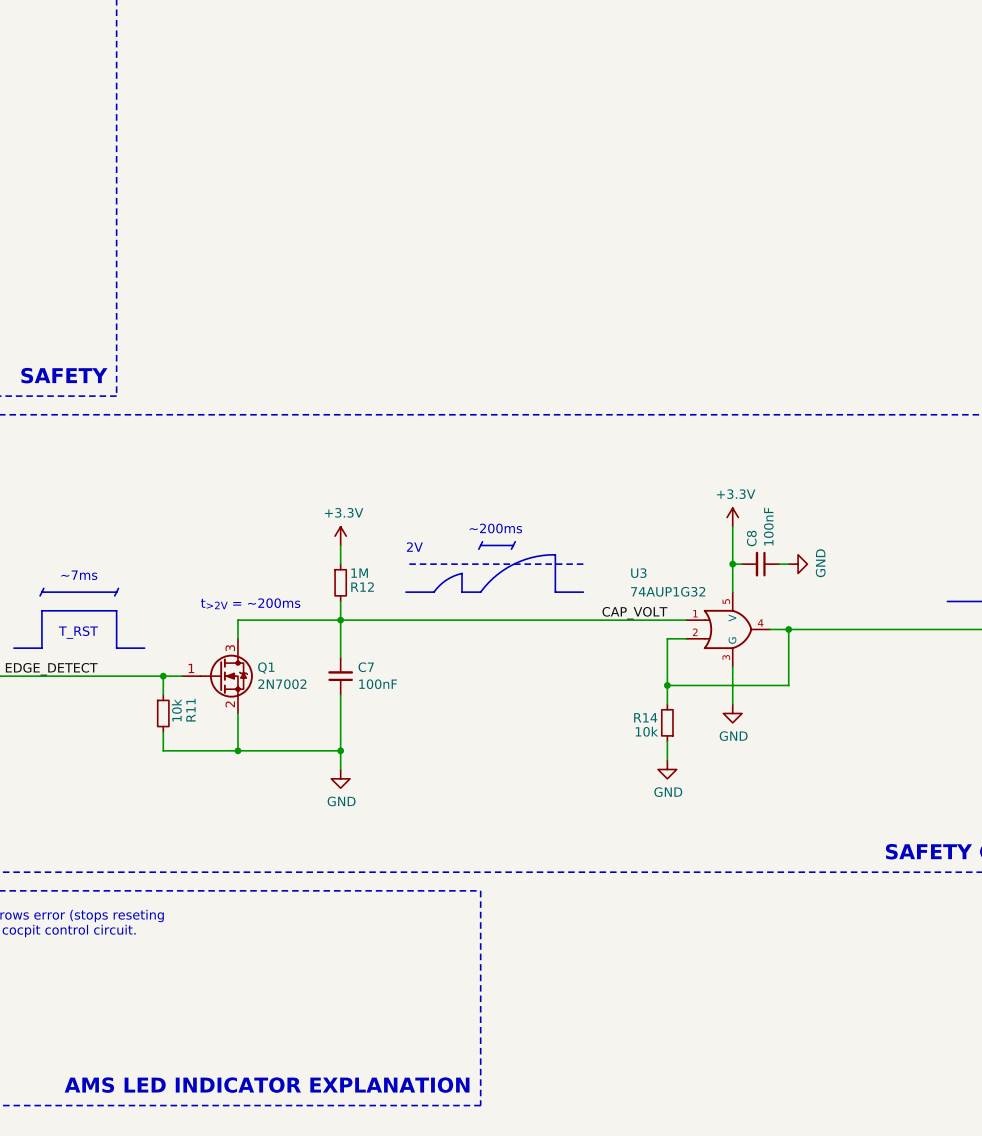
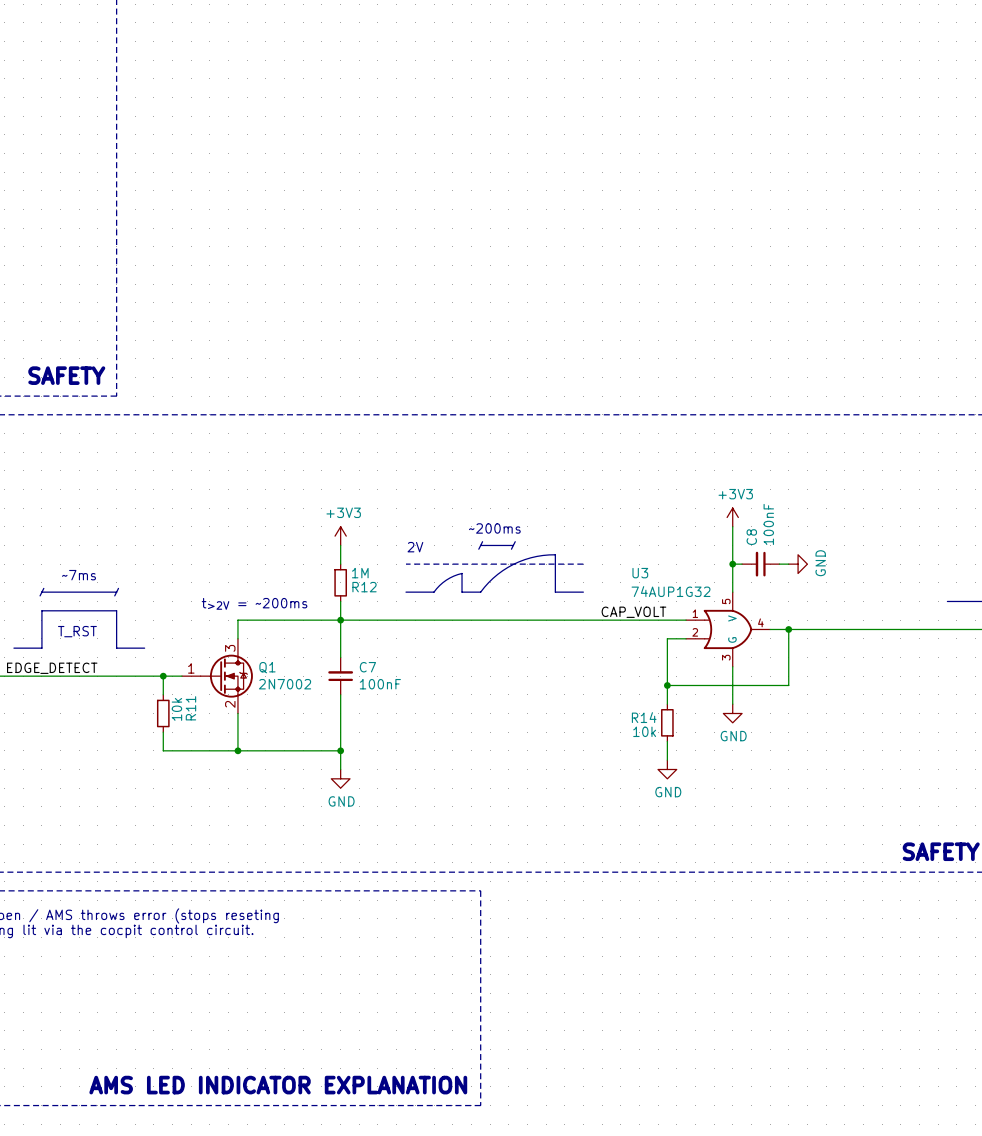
power symbol: +3.3V (732, 517) -> +3V3 (732, 517)
power symbol: +3.3V (340, 536) -> +3V3 (340, 536)

